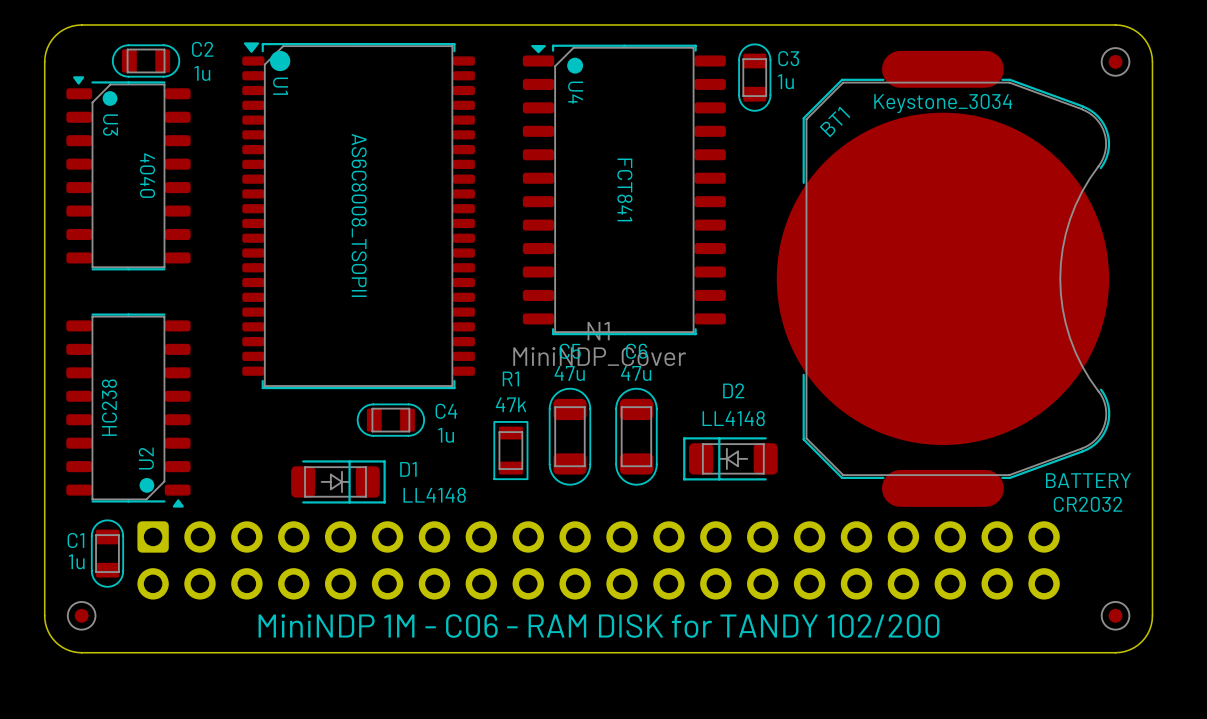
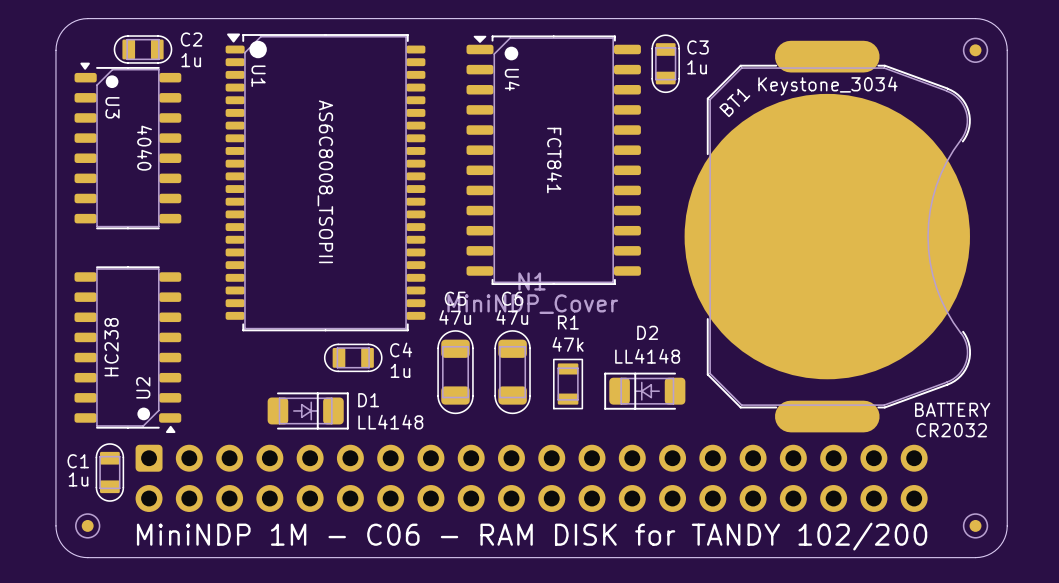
C5 position: (569, 436) -> (455, 372)
C6 position: (636, 436) -> (512, 372)
R1 position: (510, 450) -> (568, 384)

